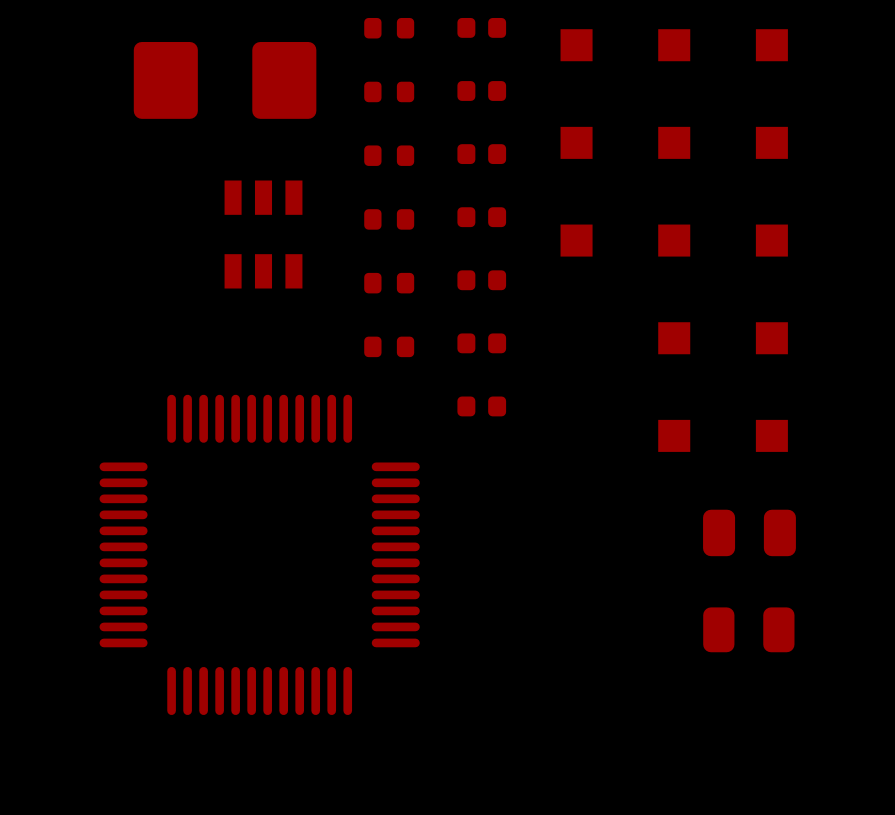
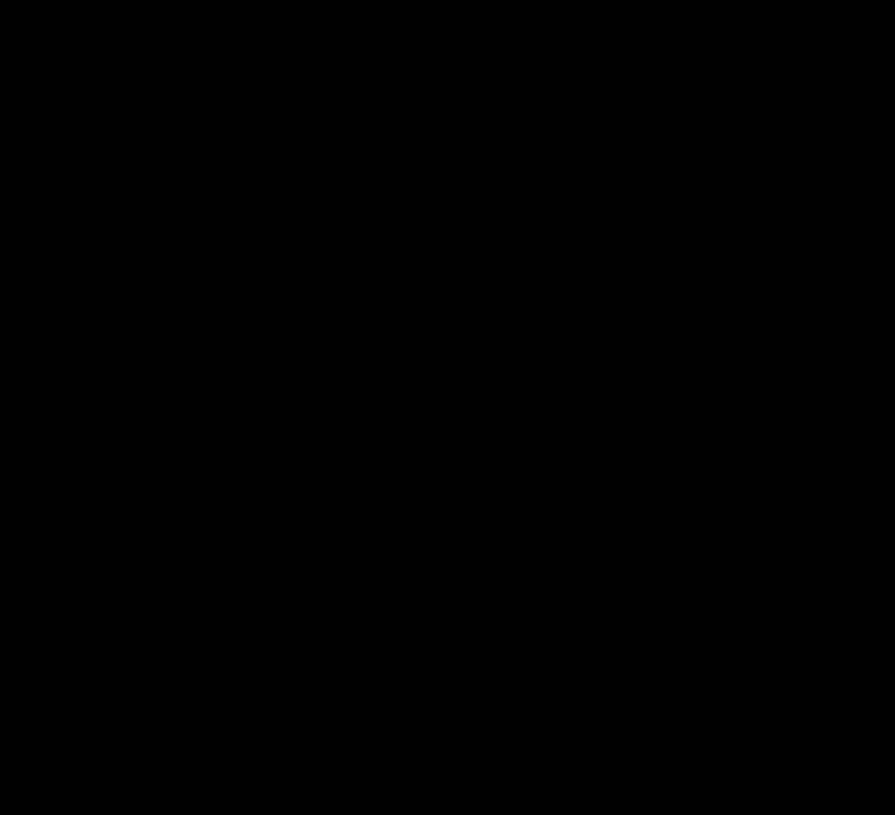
part: (481, 27) -> none
part: (389, 28) -> none
part: (576, 45) -> none
part: (674, 45) -> none
part: (771, 45) -> none
part: (225, 80) -> none
part: (389, 91) -> none
part: (481, 91) -> none
part: (576, 142) -> none
part: (674, 142) -> none
part: (771, 142) -> none
part: (481, 154) -> none
part: (389, 155) -> none
part: (481, 217) -> none
part: (389, 219) -> none
part: (263, 234) -> none
part: (576, 240) -> none
part: (674, 240) -> none
part: (771, 240) -> none
part: (481, 280) -> none
part: (389, 283) -> none
part: (674, 338) -> none
part: (771, 338) -> none
part: (481, 343) -> none
part: (389, 346) -> none
part: (481, 406) -> none
part: (674, 435) -> none
part: (771, 435) -> none
part: (749, 532) -> none
part: (259, 554) -> none
part: (748, 629) -> none

